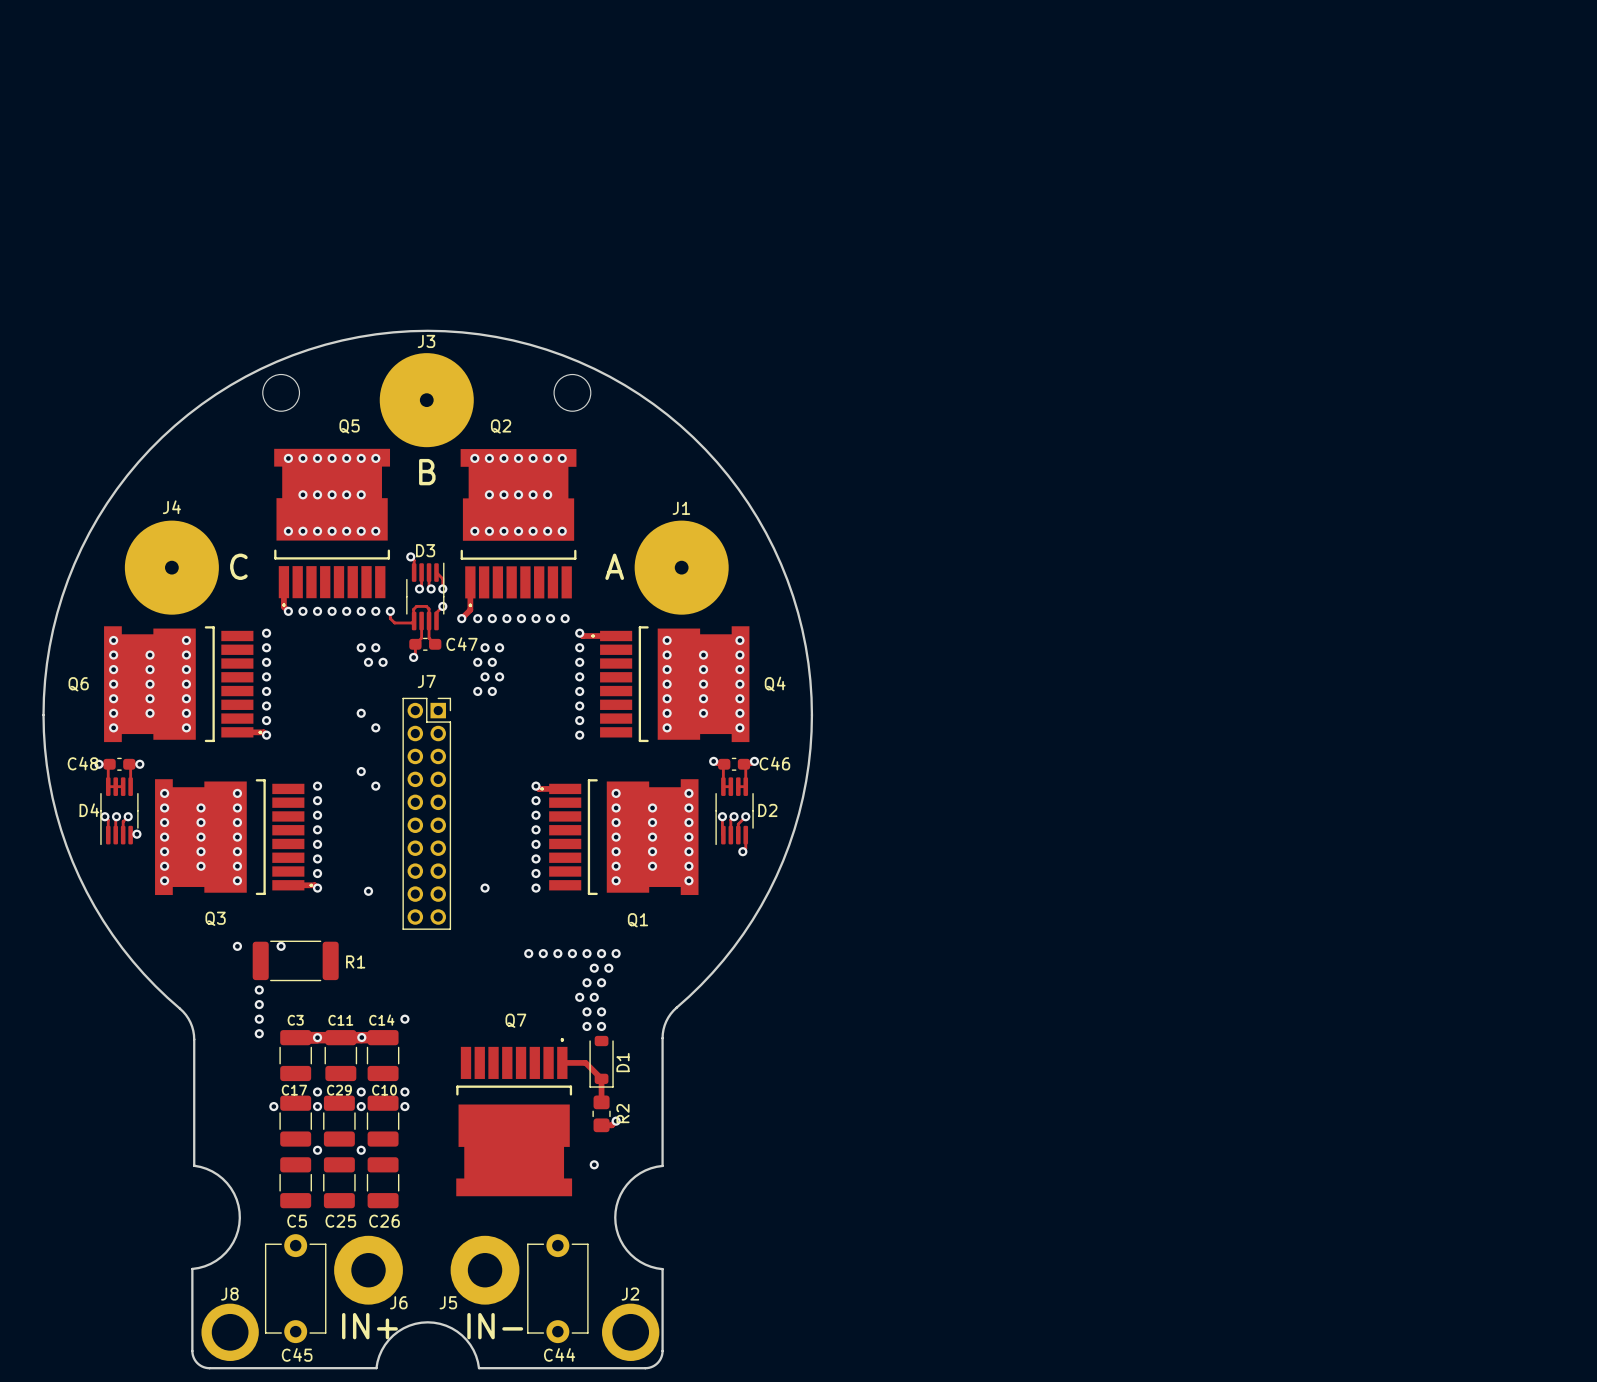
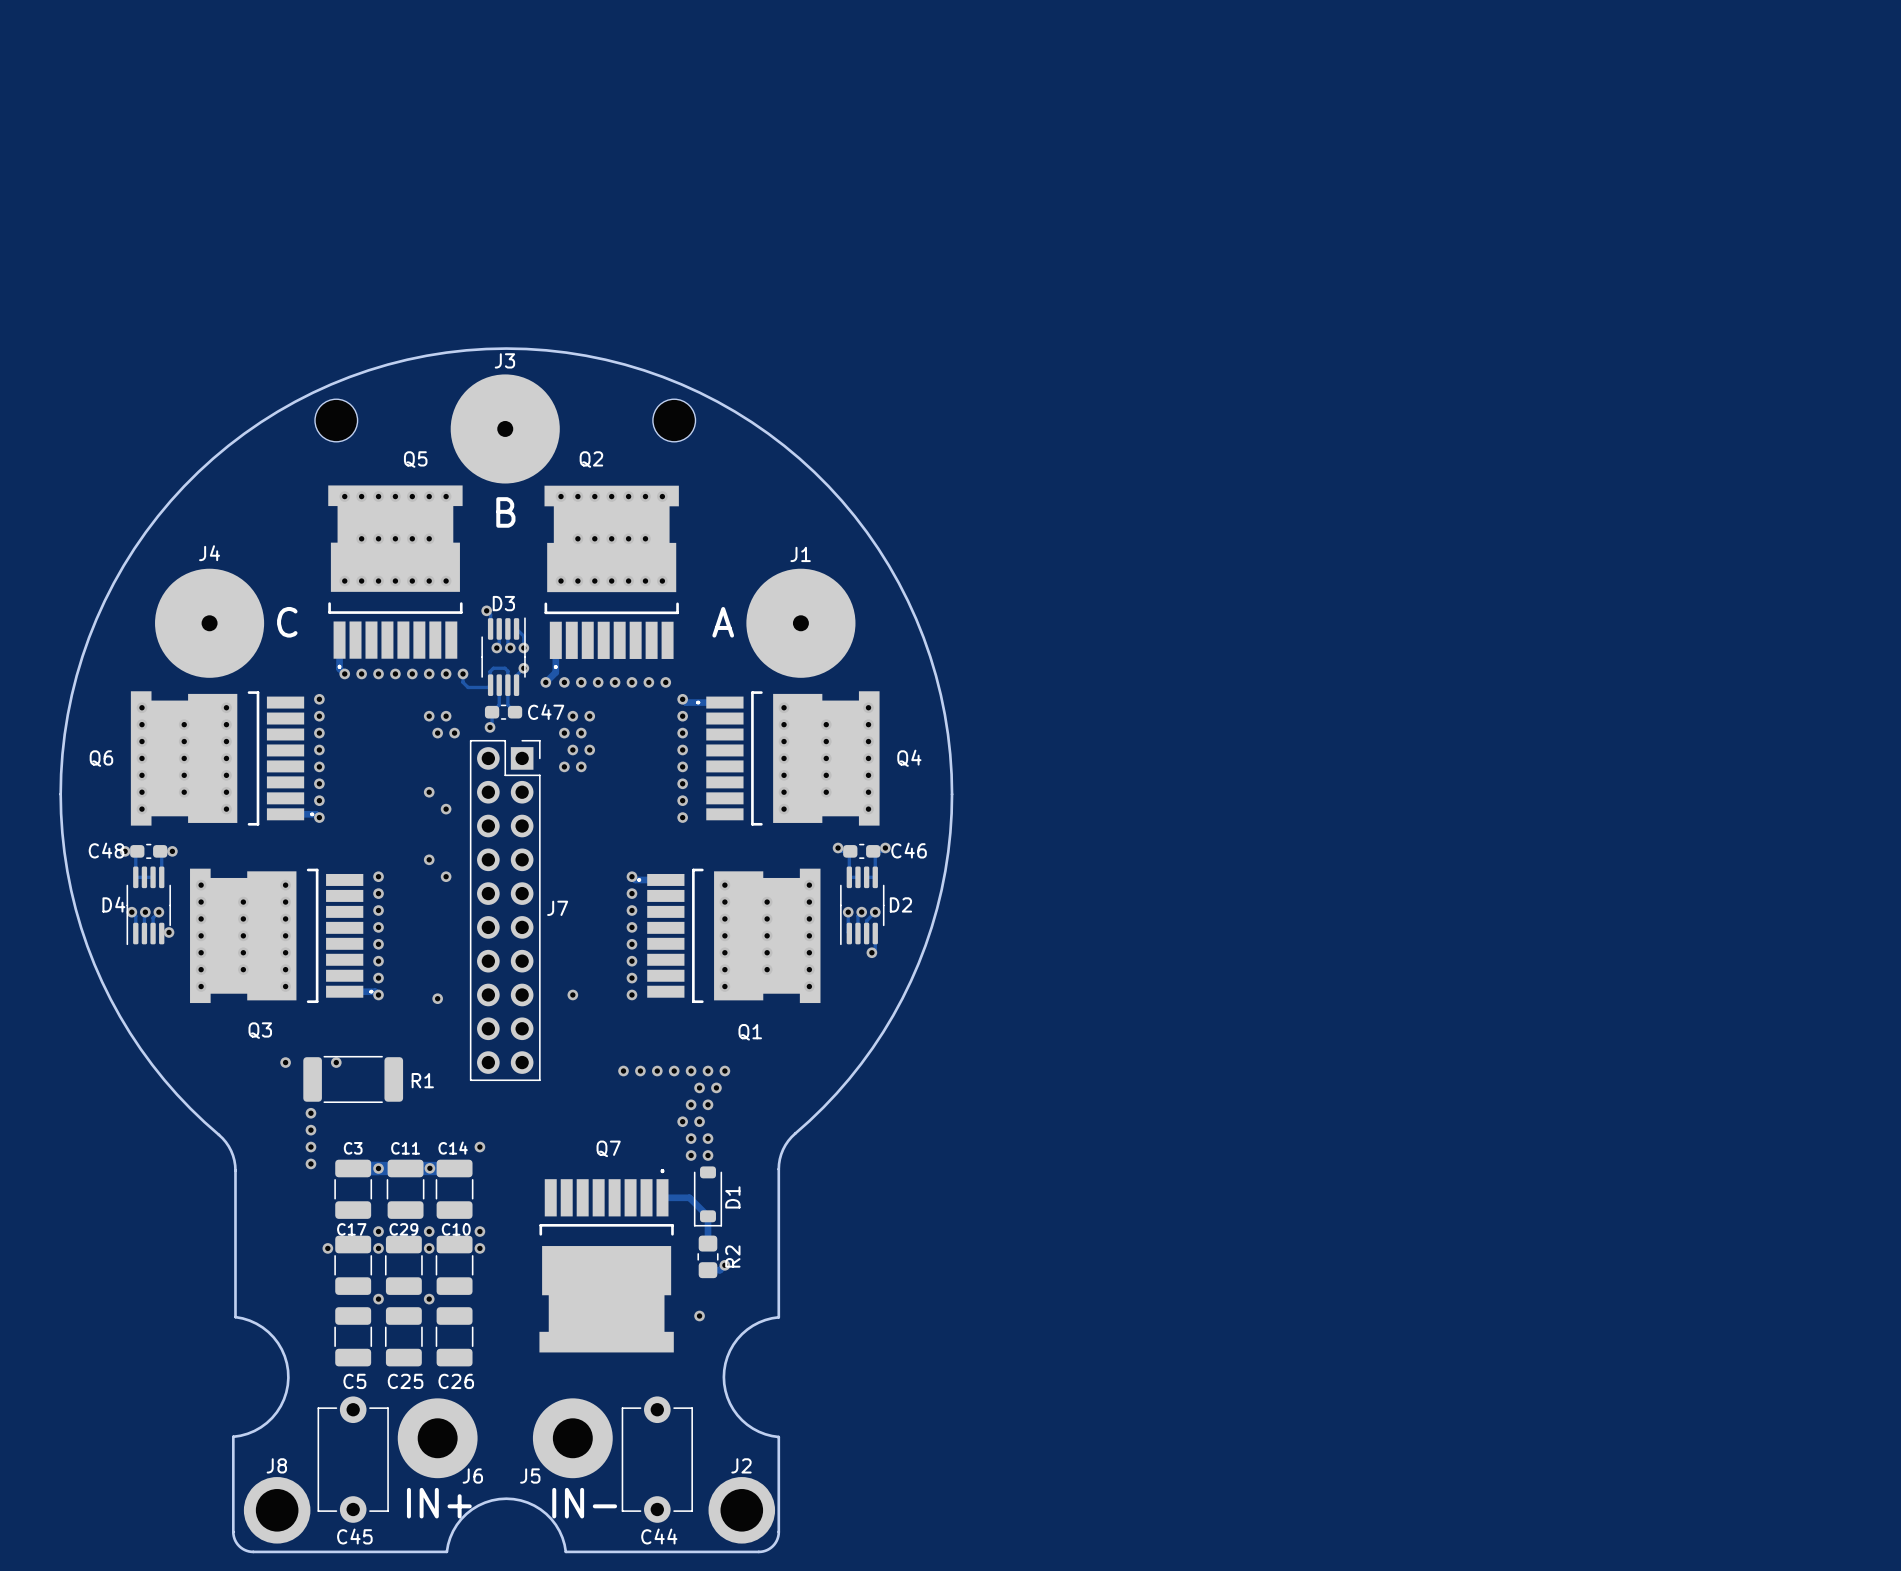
J7 name position: J7 (426, 681) -> J7 (557, 908)
J7 footprint: [402, 697, 452, 930] -> [469, 739, 541, 1082]

